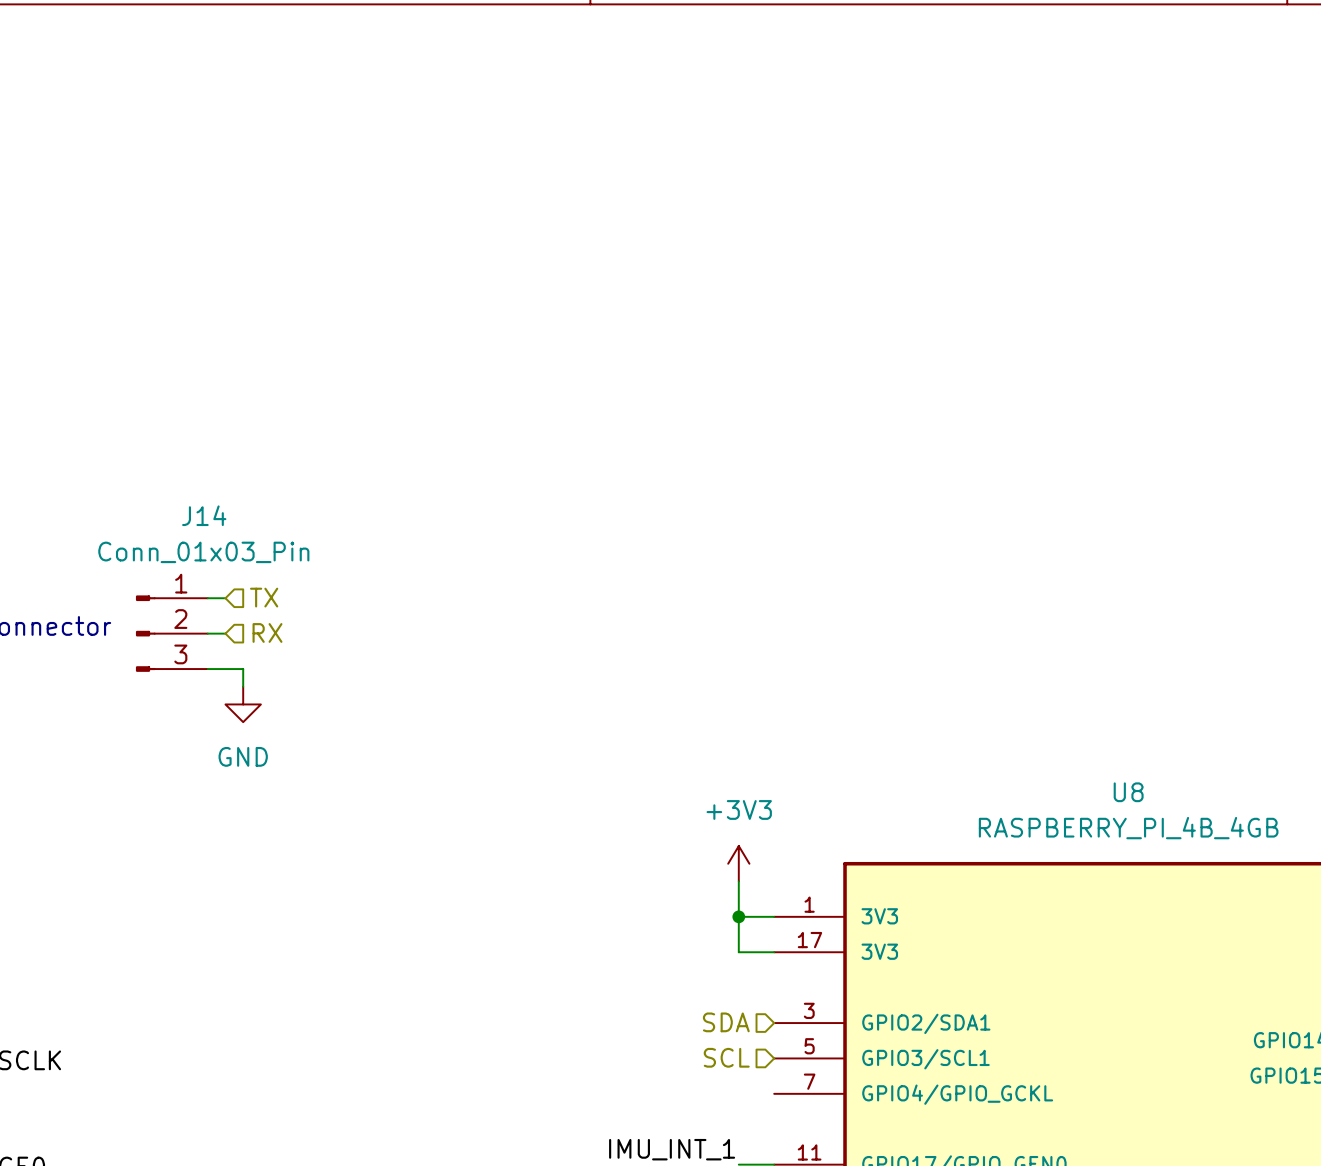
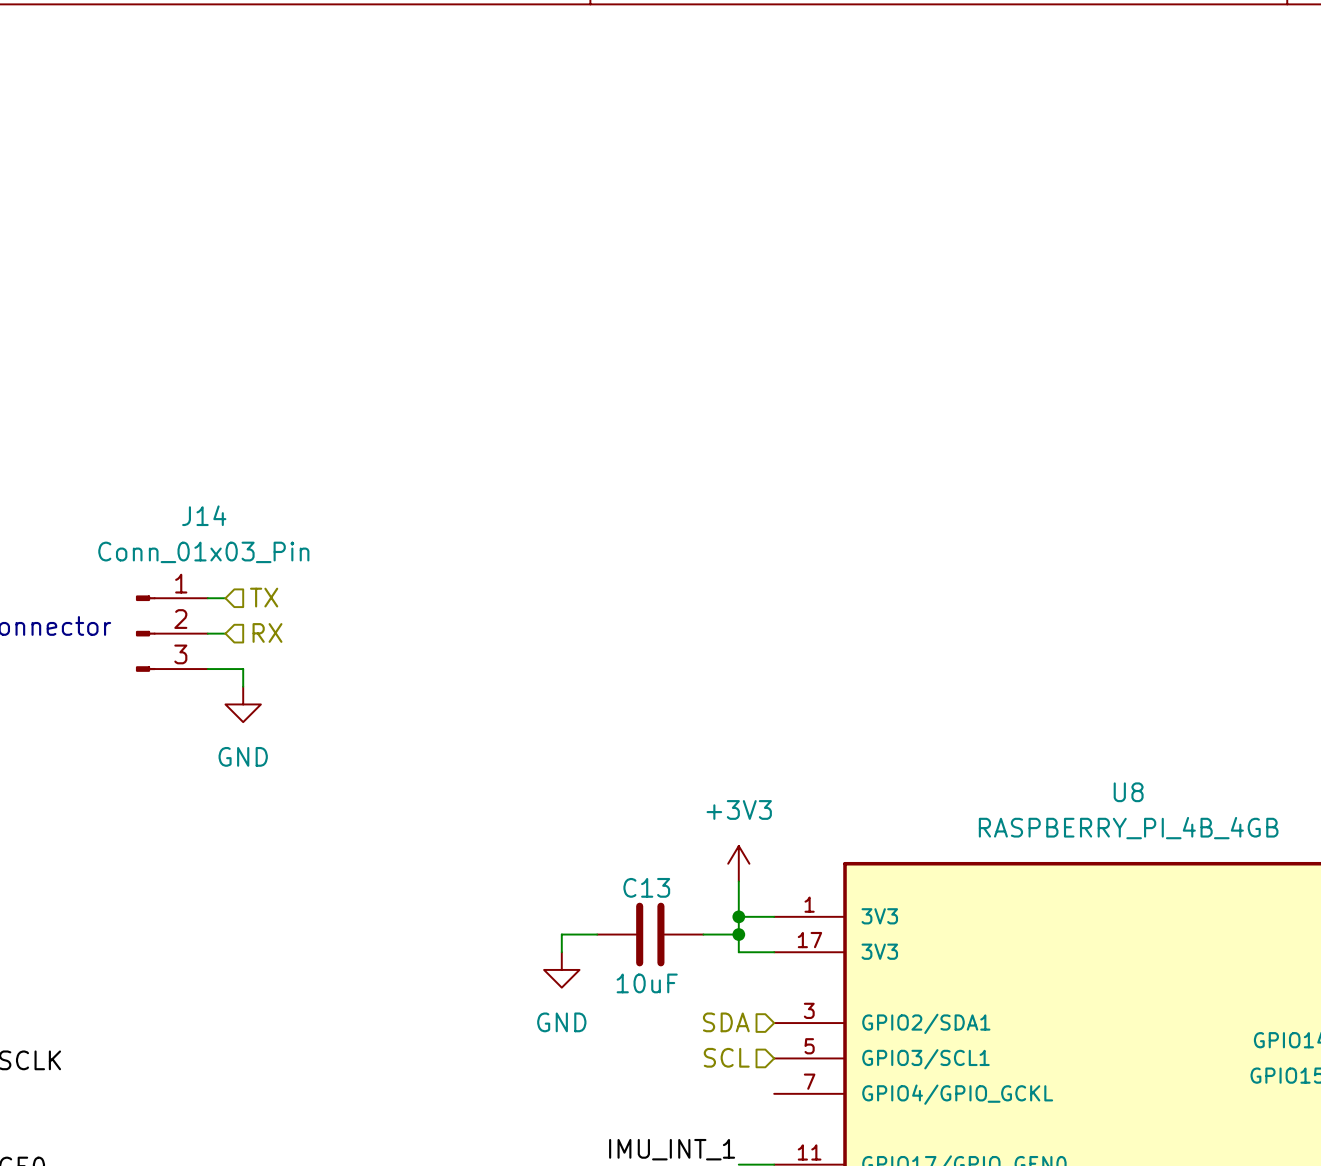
wire: none -> (597, 934) (561, 934) (561, 952)
C13: none -> 10uF (650, 934)
wire: none -> (703, 934) (738, 934)
junction: none -> (738, 934)
power symbol: none -> GND (561, 969)

